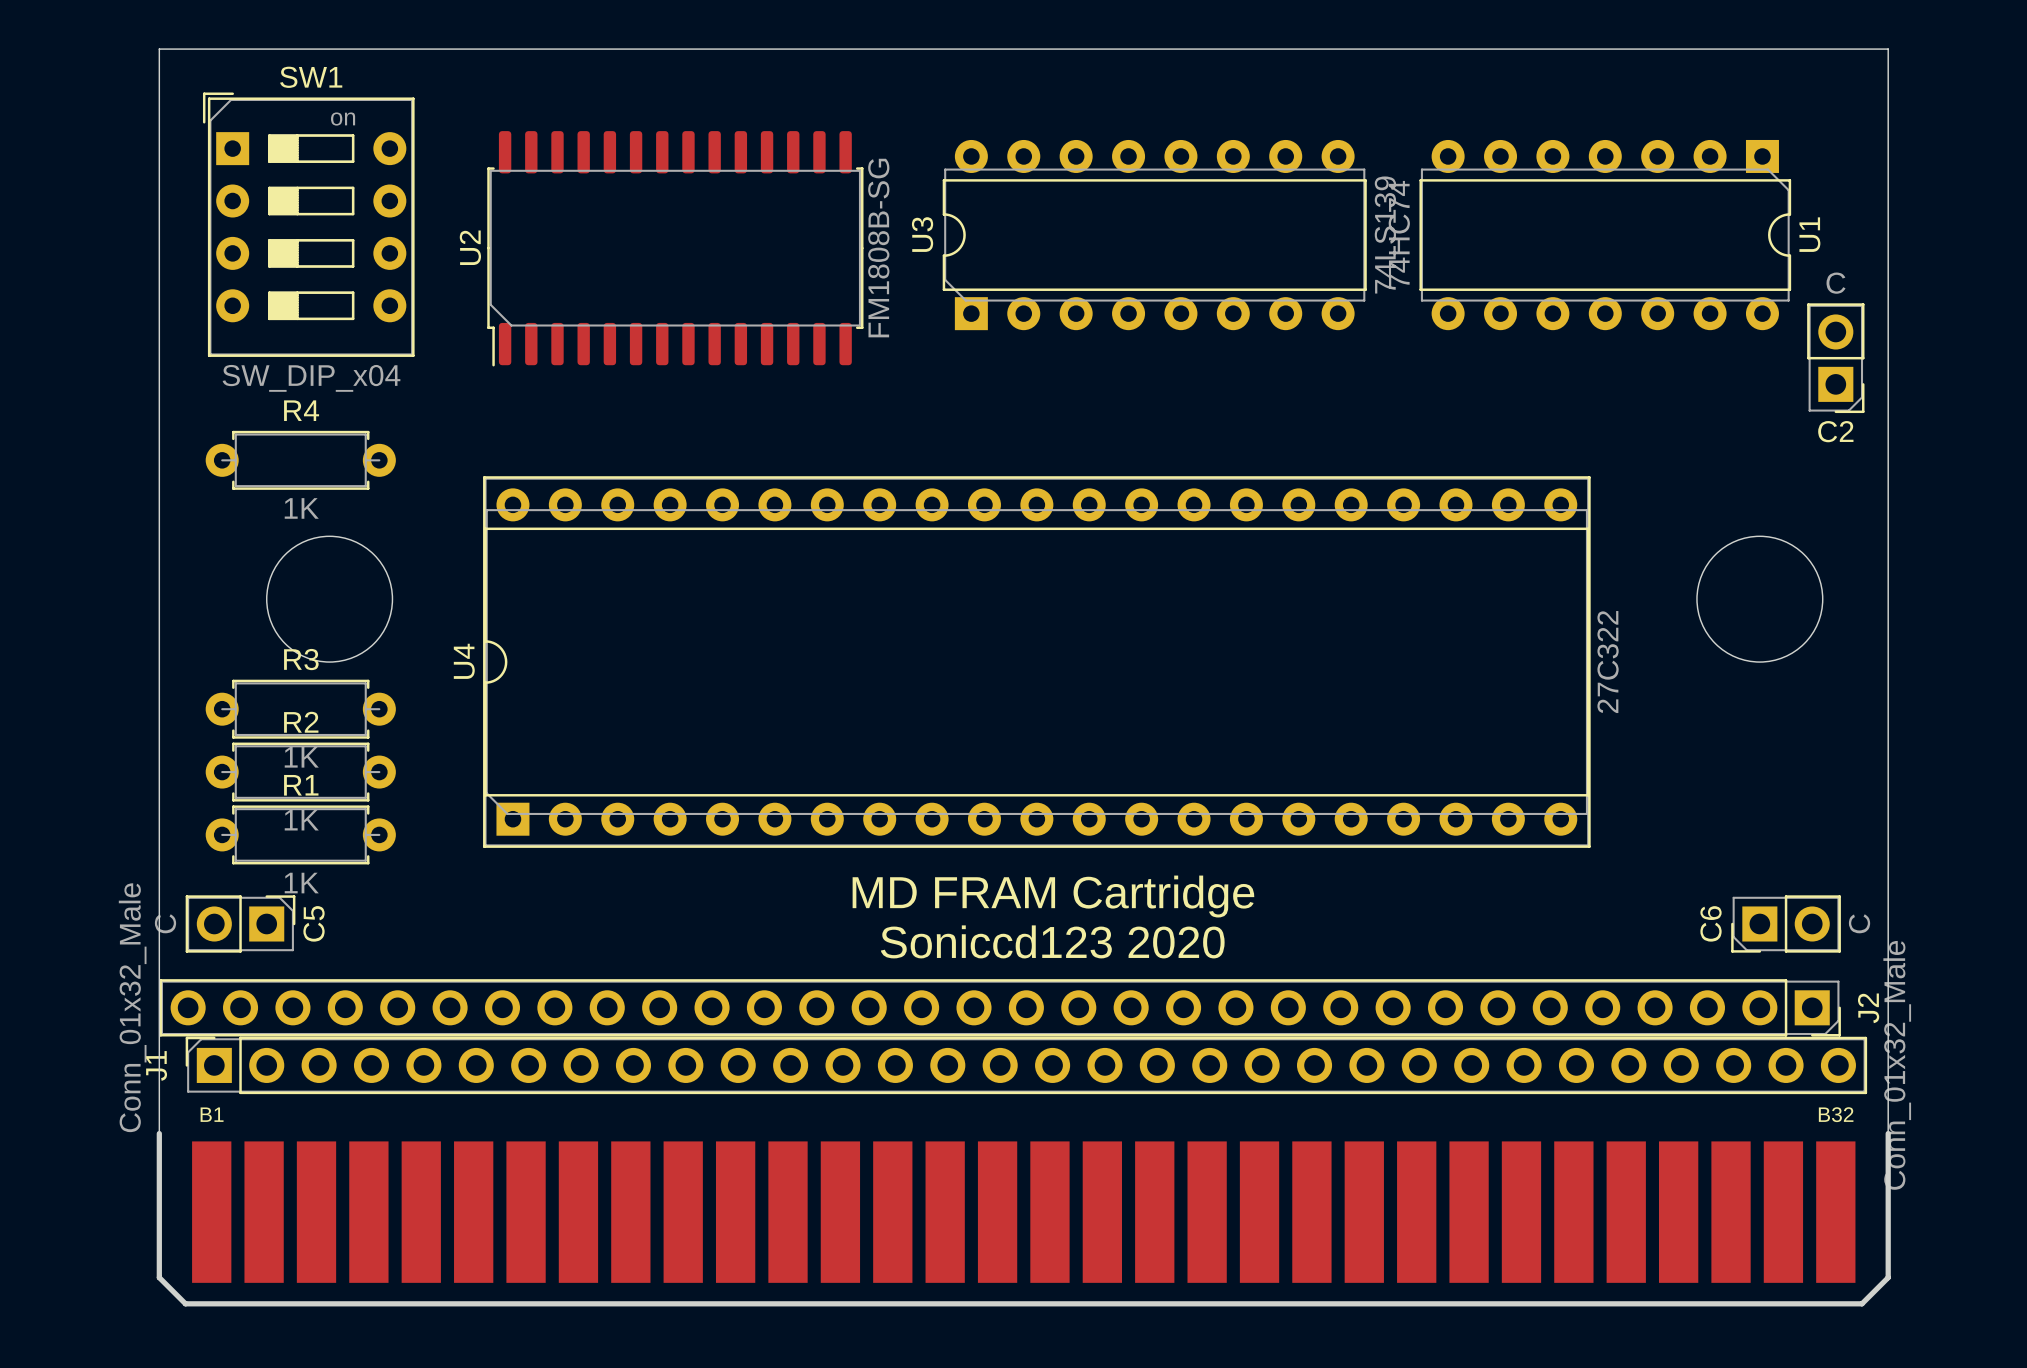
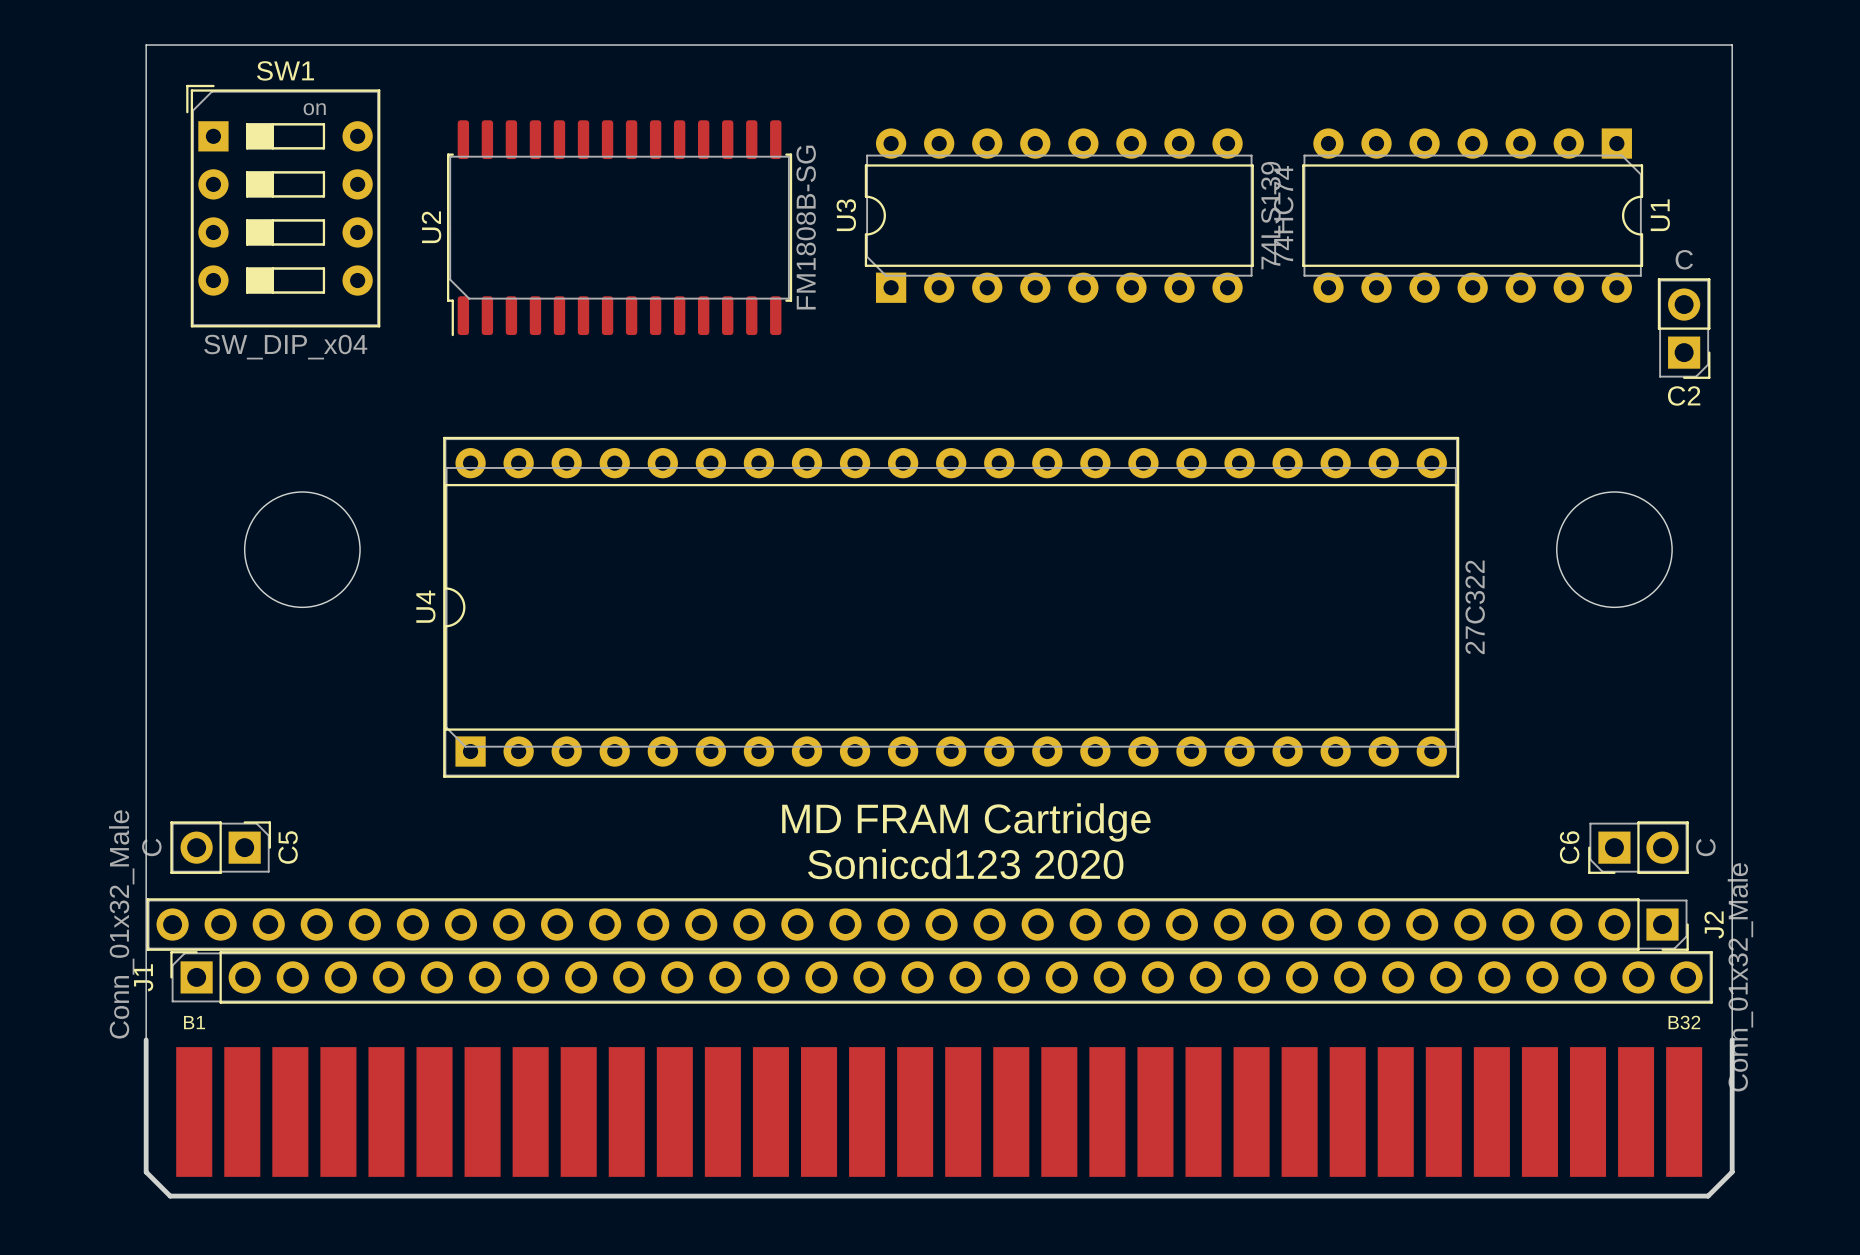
R4: 1K (300, 460) -> none
R3: 1K (300, 709) -> none
R2: 1K (300, 772) -> none
R1: 1K (300, 834) -> none

